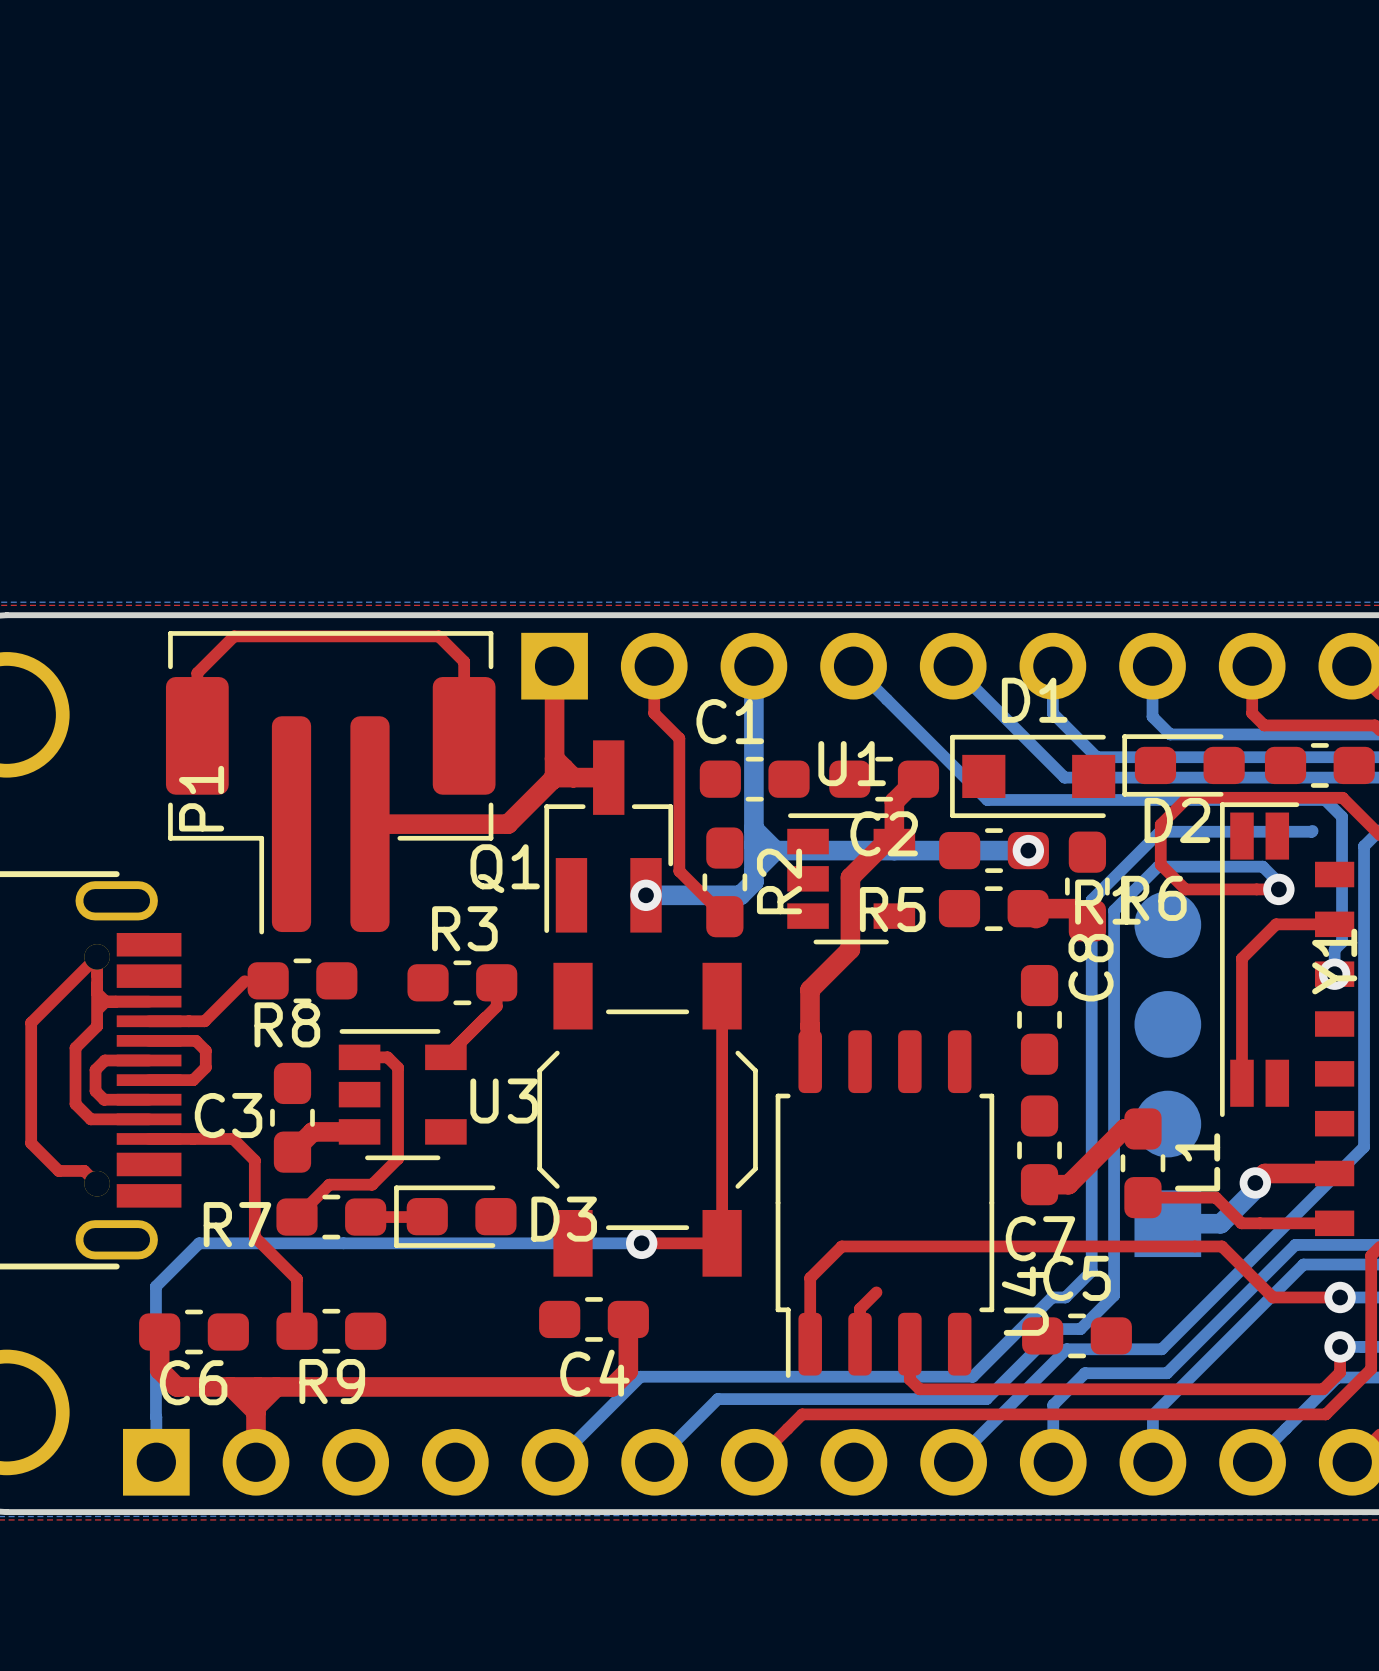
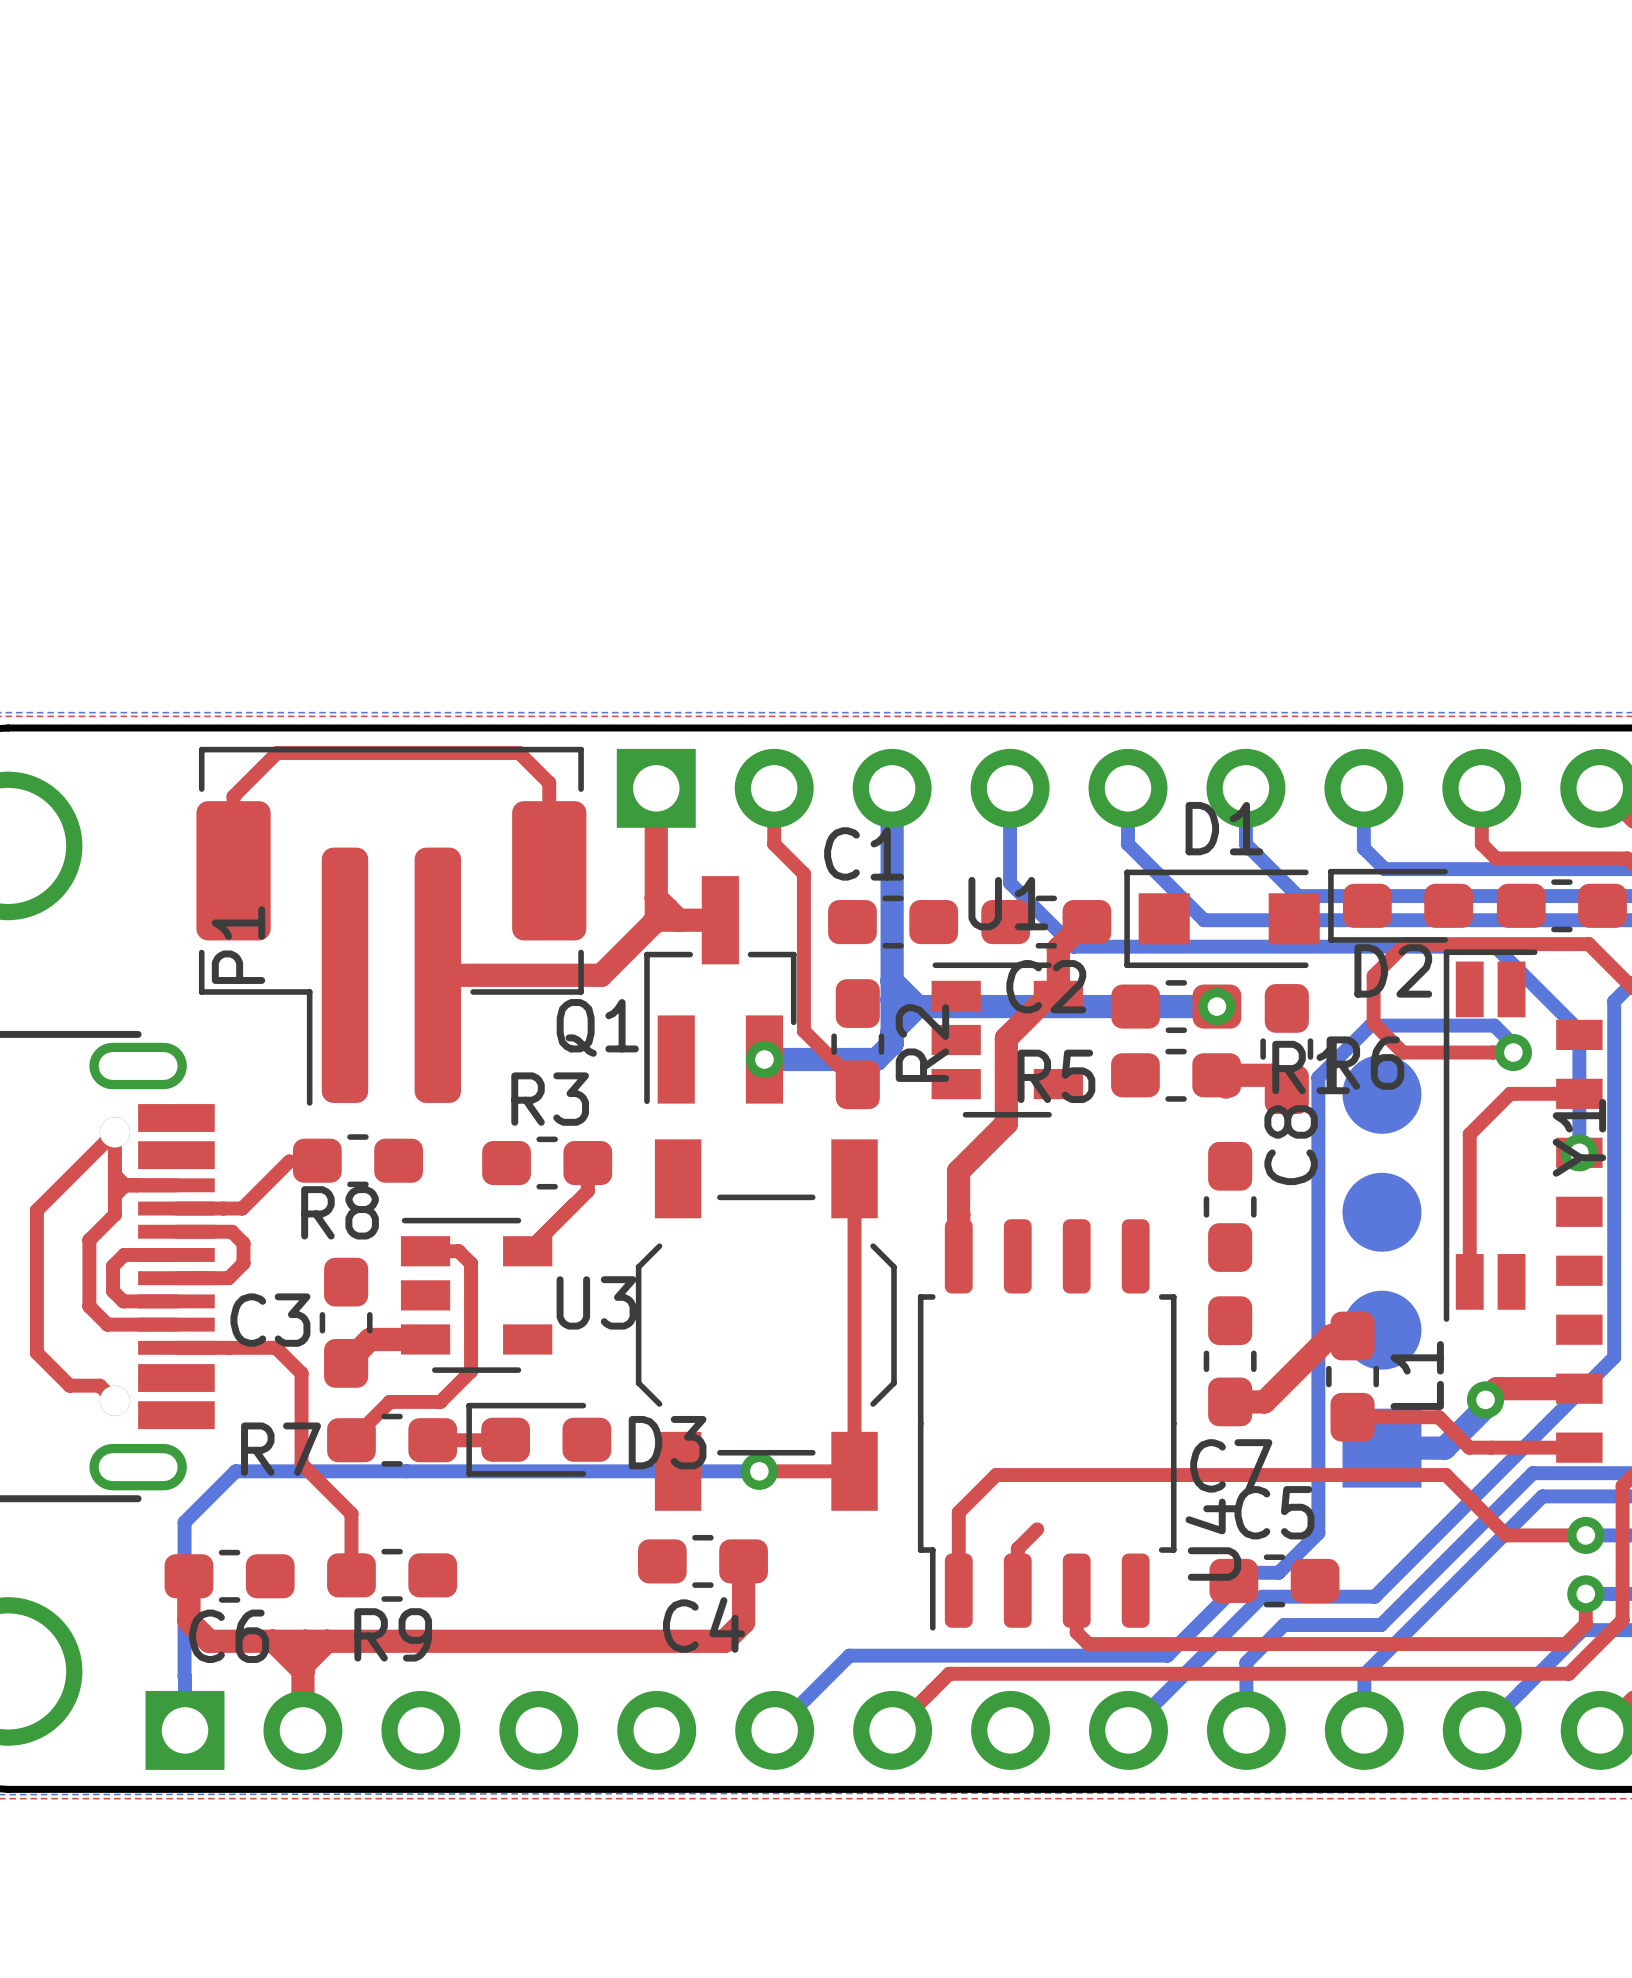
bottom track: (853, 666) (987, 799) -> (1010, 788) (1010, 883) (1073, 946) (1168, 946)
bottom track: (953, 666) (1064, 777) -> (1128, 788) (1128, 844) (1204, 920) (1259, 920)
bottom track: (1263, 799) (1325, 799) (1342, 816) (1342, 942) (1334, 949) -> (1495, 946) (1579, 1030) (1579, 1123)
bottom track: (1312, 830) (1159, 831) (1091, 900) (1091, 1271) (1065, 1297) (1052, 1297) (972, 1376) (640, 1376) (554, 1462) -> none

